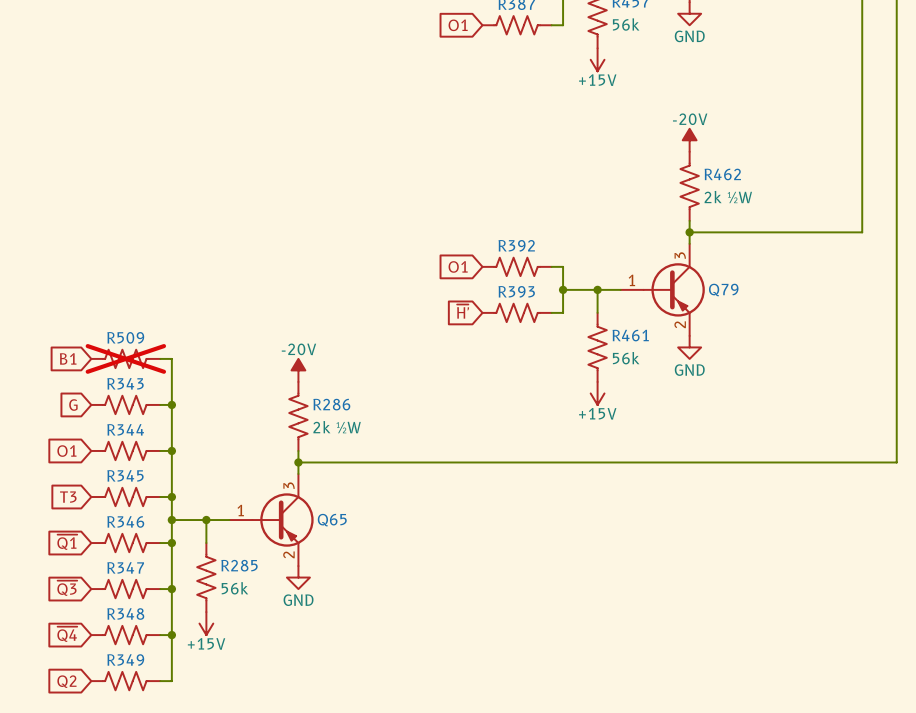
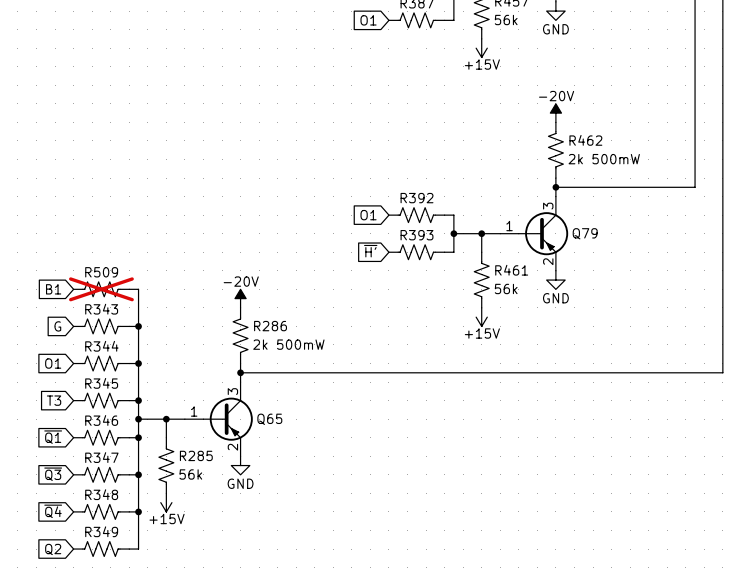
R462 value: 2k ½W (728, 197) -> 2k 500mW (604, 159)
R286 value: 2k ½W (337, 427) -> 2k 500mW (288, 344)

